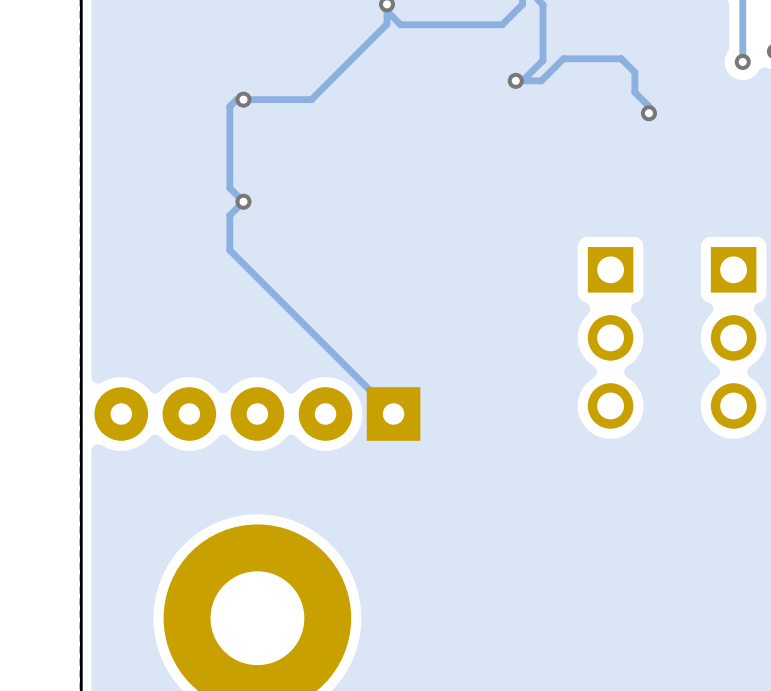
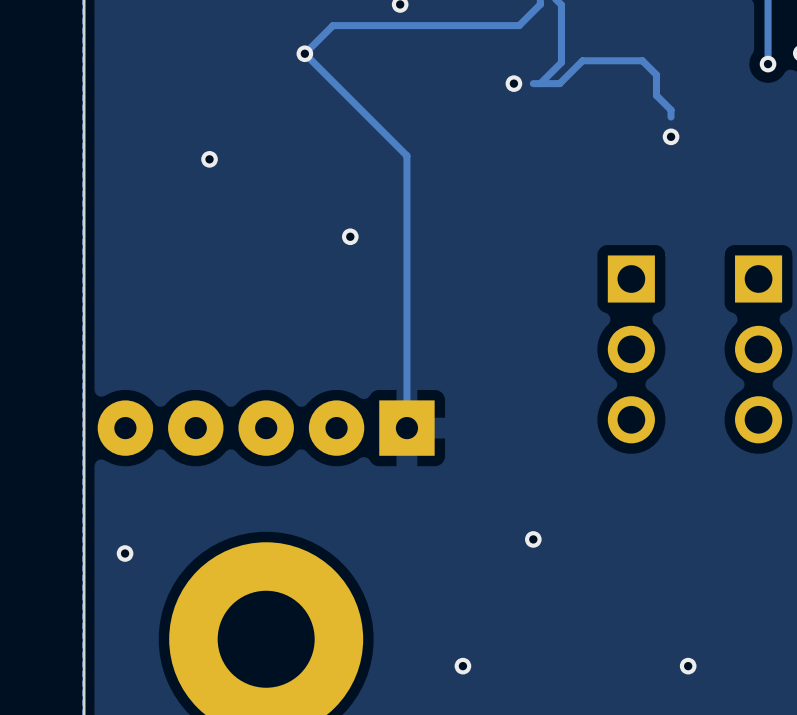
track: (386, 4) (386, 24) (311, 99) (236, 99) (229, 106) (229, 188) (243, 201) (229, 215) (229, 250) (393, 414) -> (414, 25) (333, 25) (304, 53) (406, 155) (406, 428)
track: (386, 11) (400, 24) -> none
via: none -> (304, 53)
via position: (515, 80) -> (513, 83)
via: (243, 99) -> none
via position: (648, 113) -> (671, 136)
via: none -> (209, 159)
via: (243, 201) -> none
via: none -> (350, 236)
via: none -> (533, 539)
via: none -> (125, 553)
via: none -> (462, 666)
via: none -> (688, 666)

